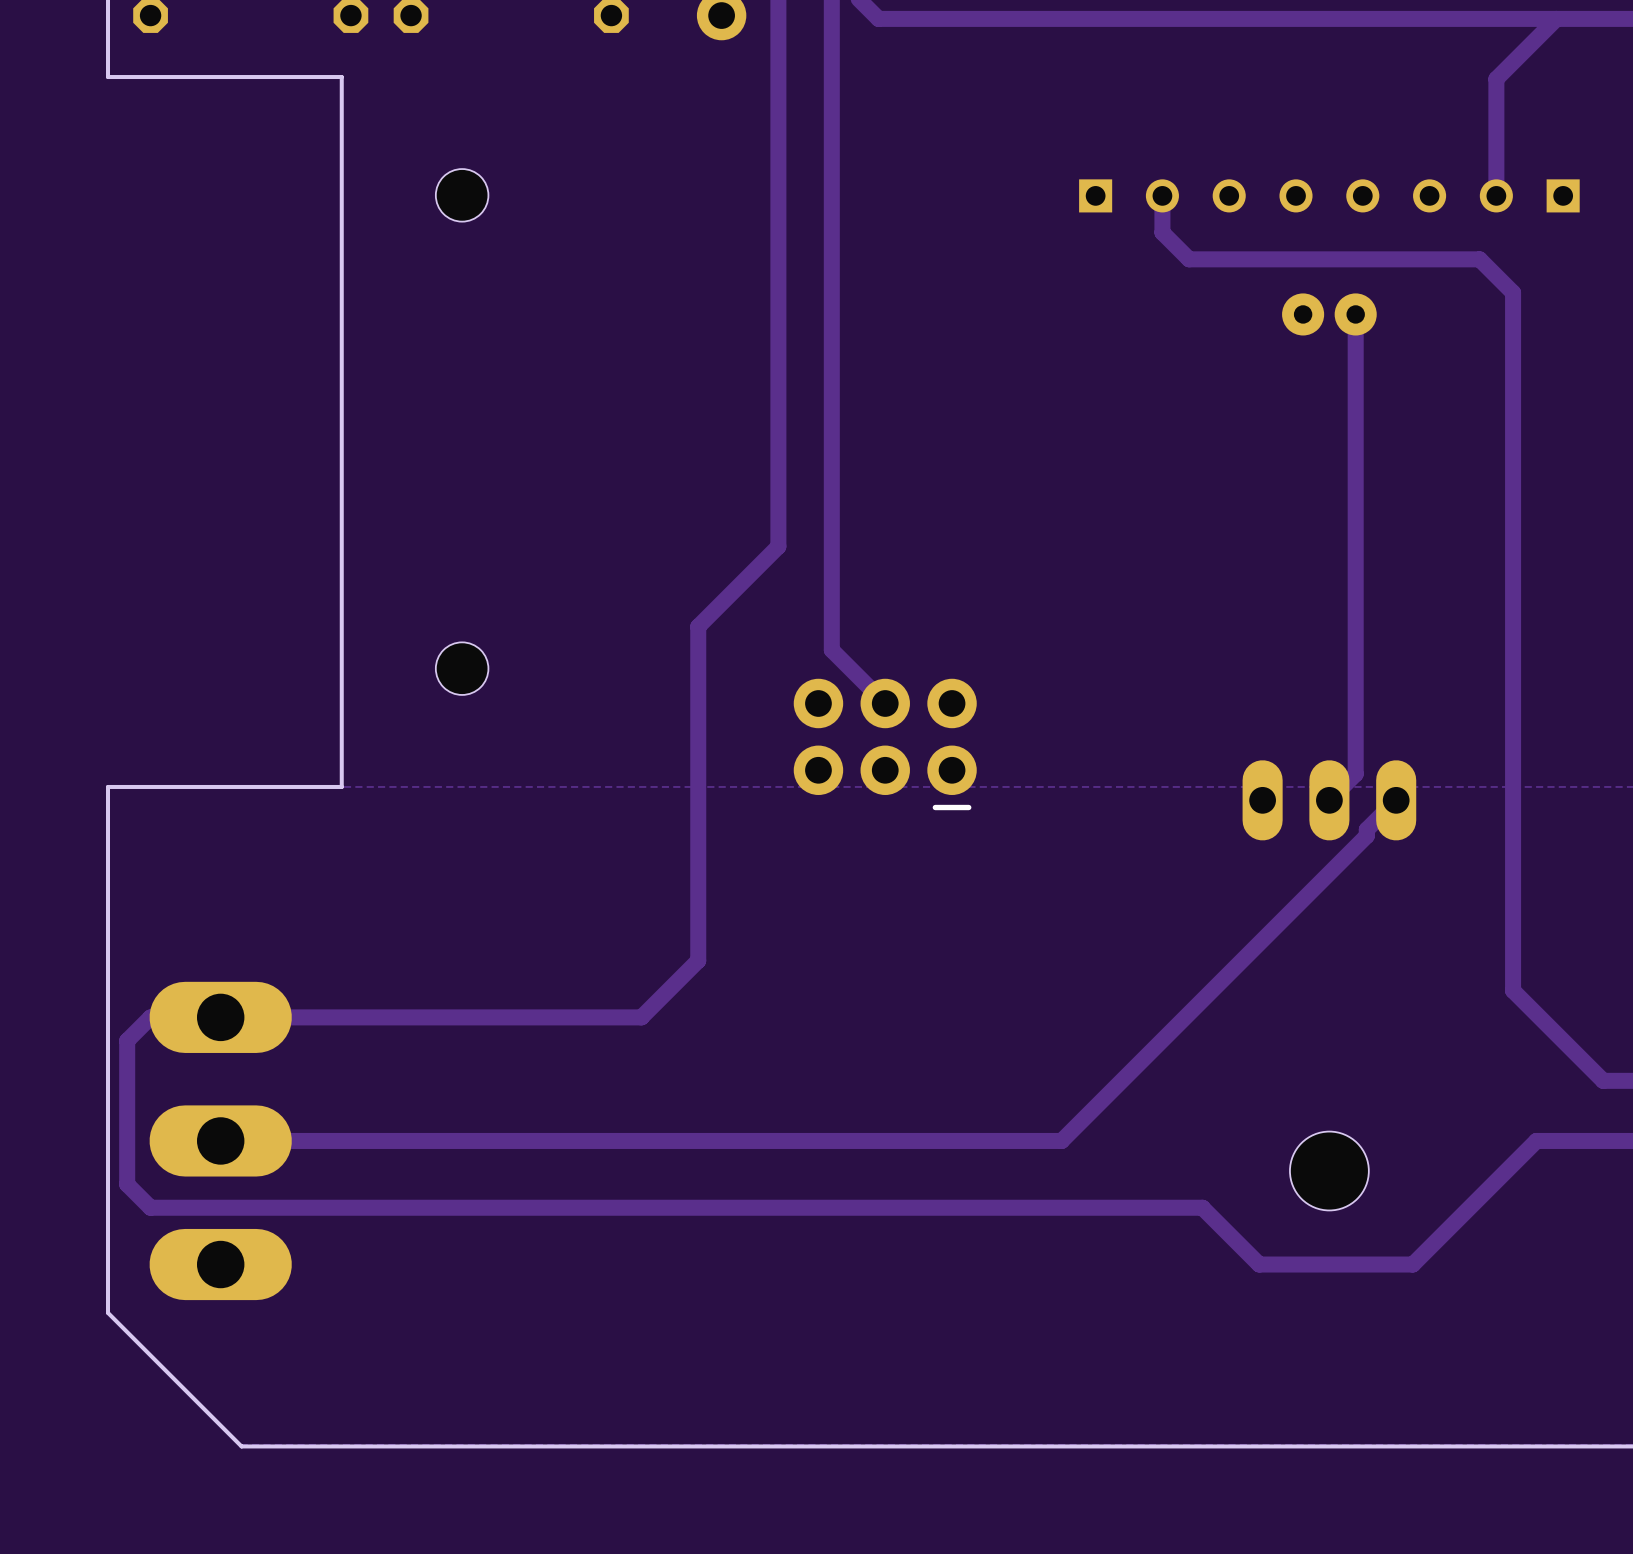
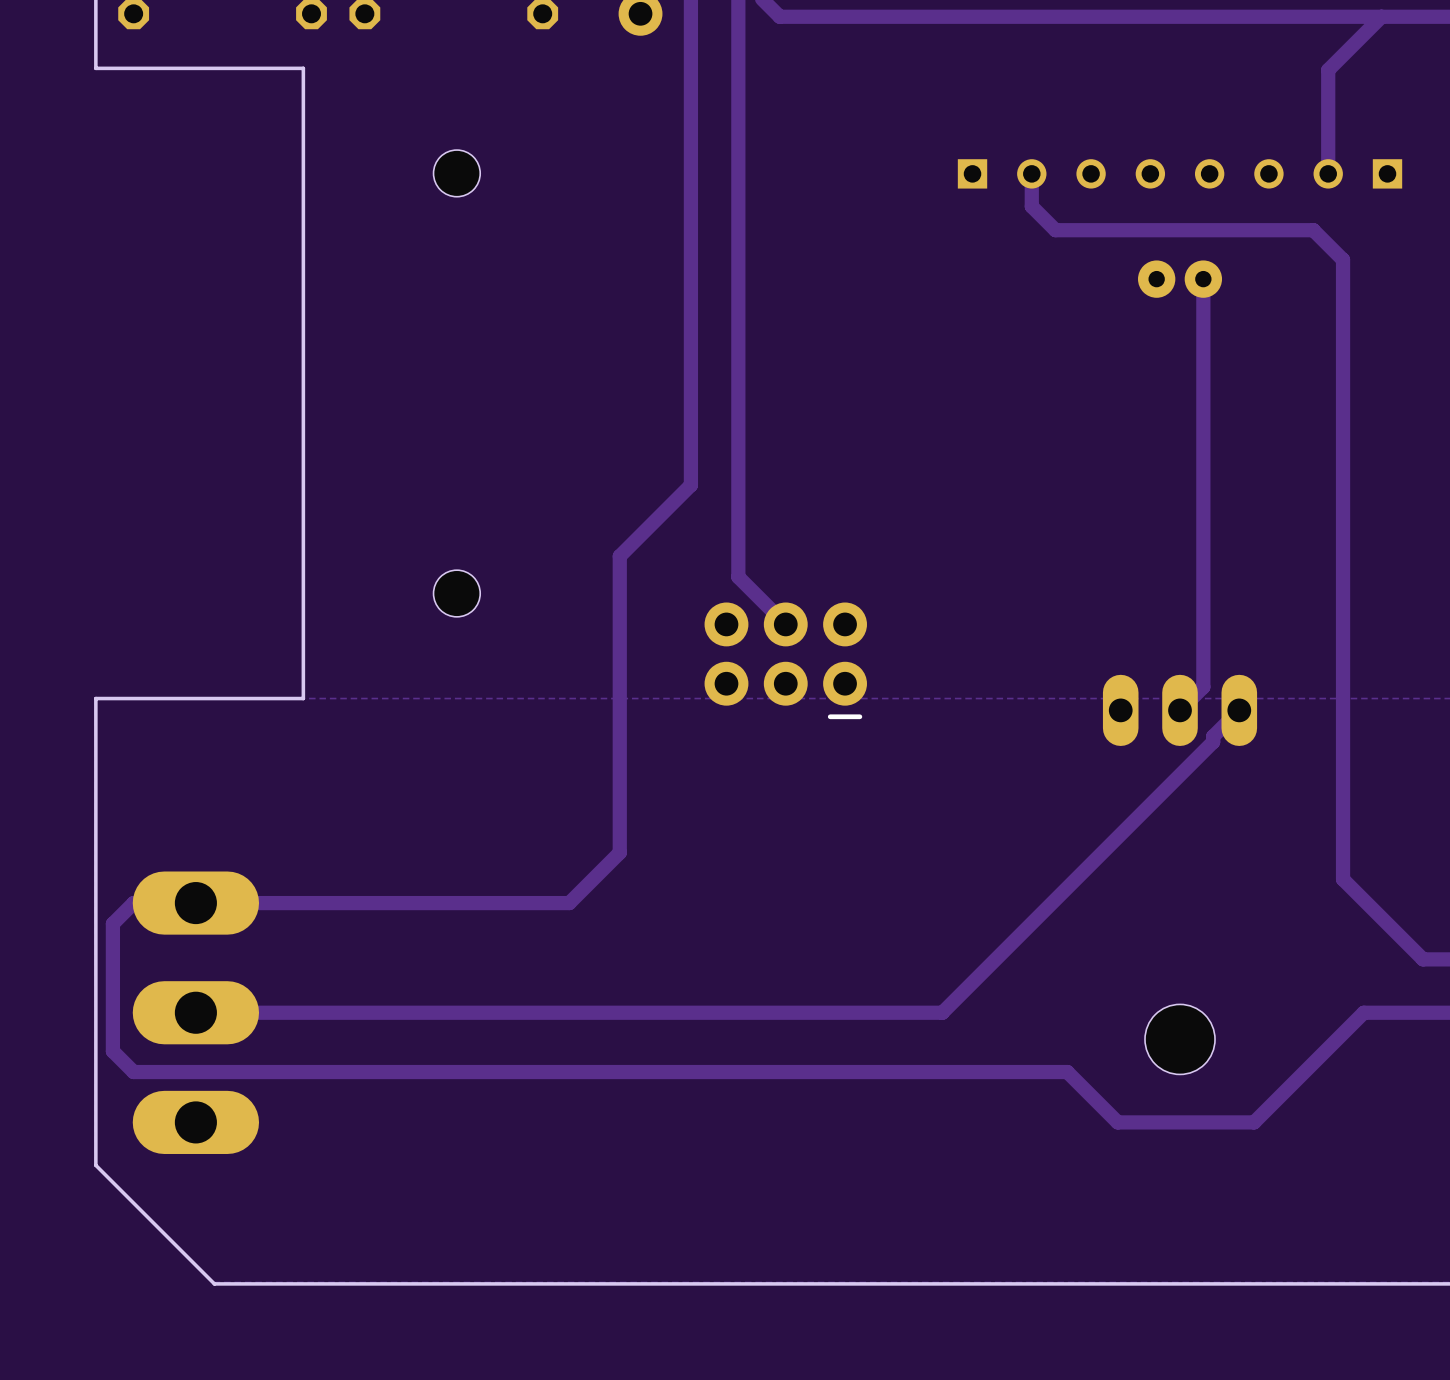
hole position: (462, 195) -> (456, 173)
hole position: (462, 668) -> (456, 593)

